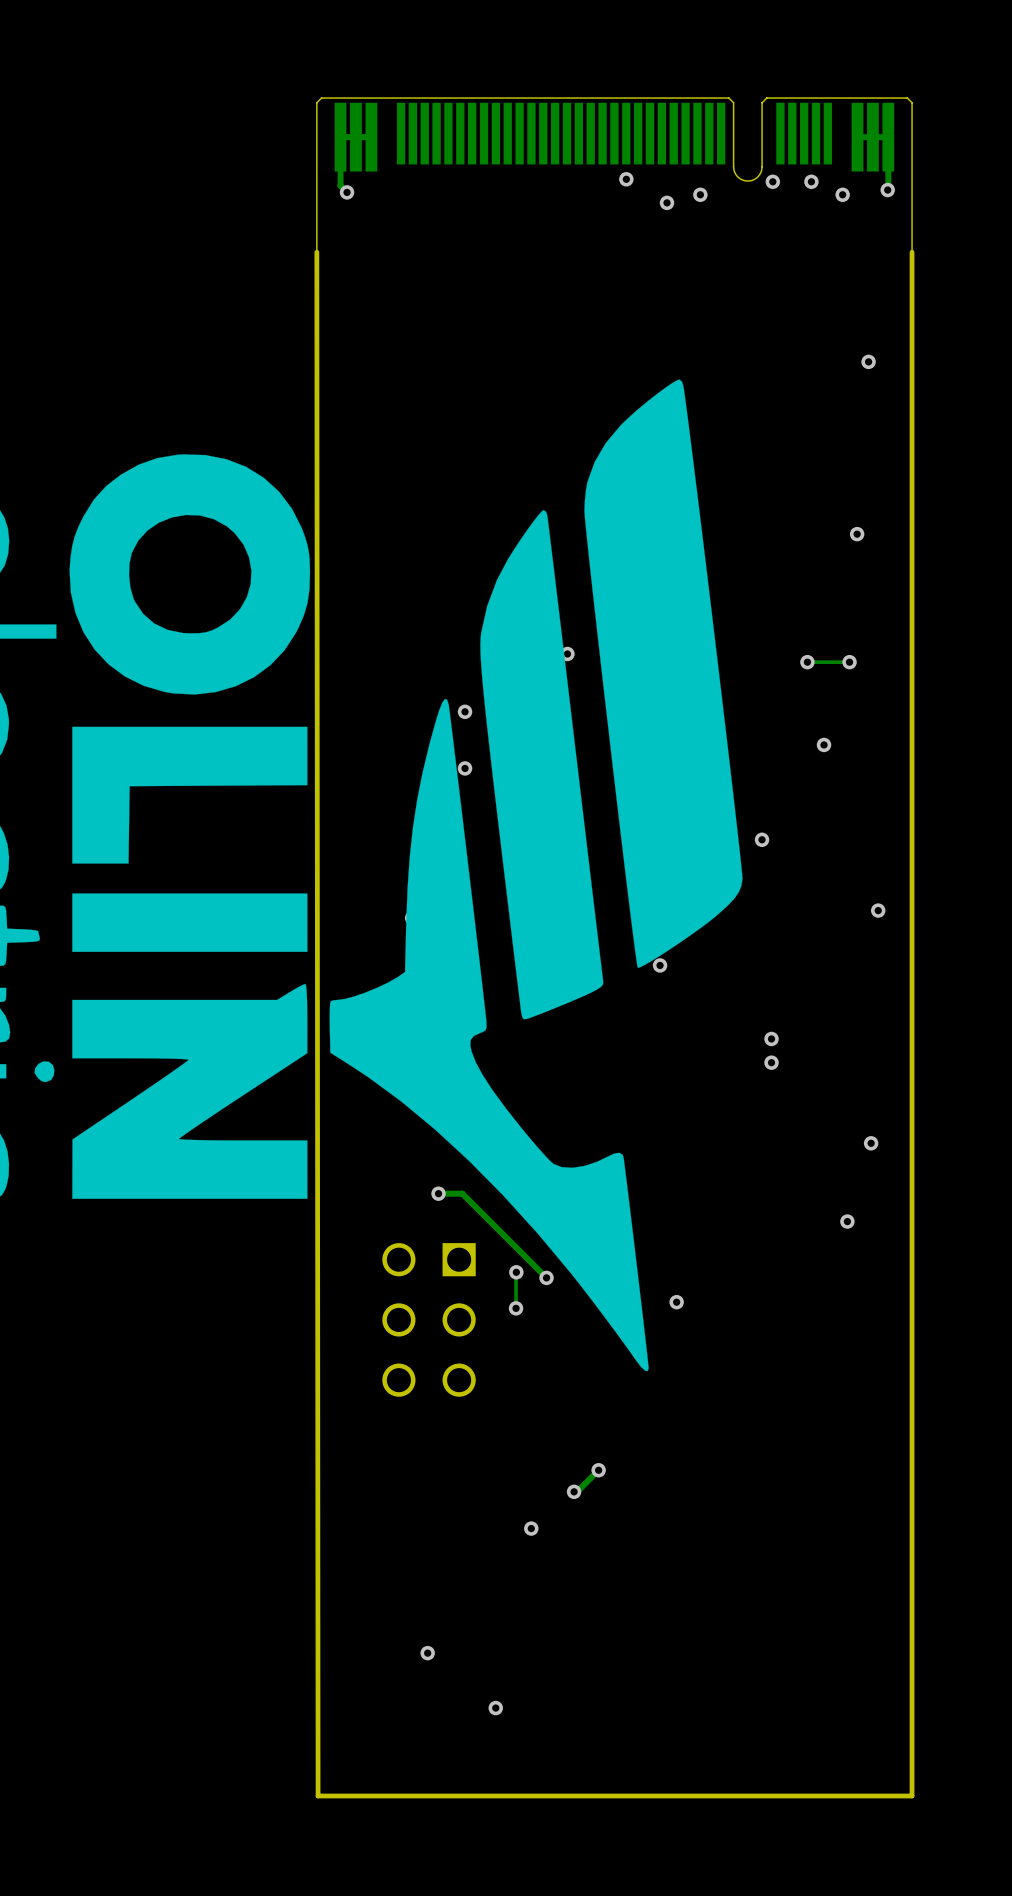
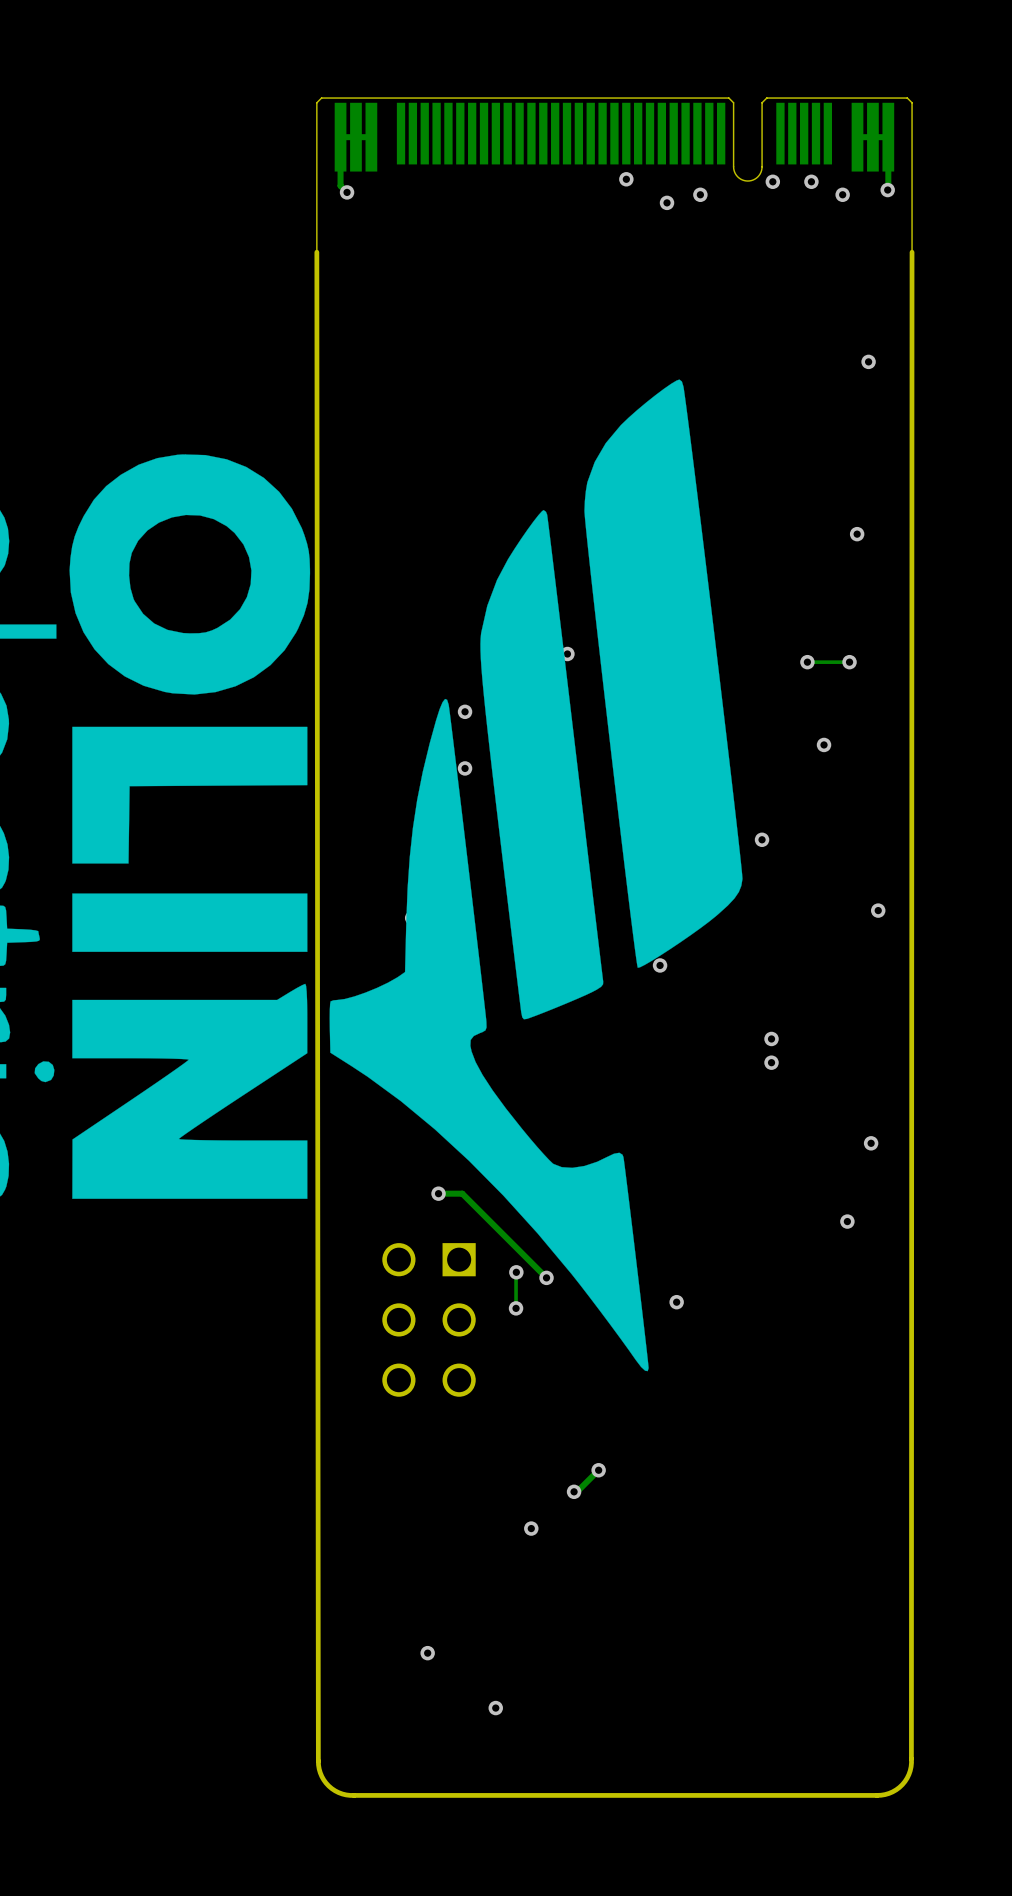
board edge: (912, 252) (912, 1795) (318, 1795) (316, 252) -> (912, 252) (911, 1762) (908, 1774) (899, 1787) (888, 1793) (877, 1795) (350, 1795) (331, 1788) (320, 1772) (318, 1761) (316, 252)

